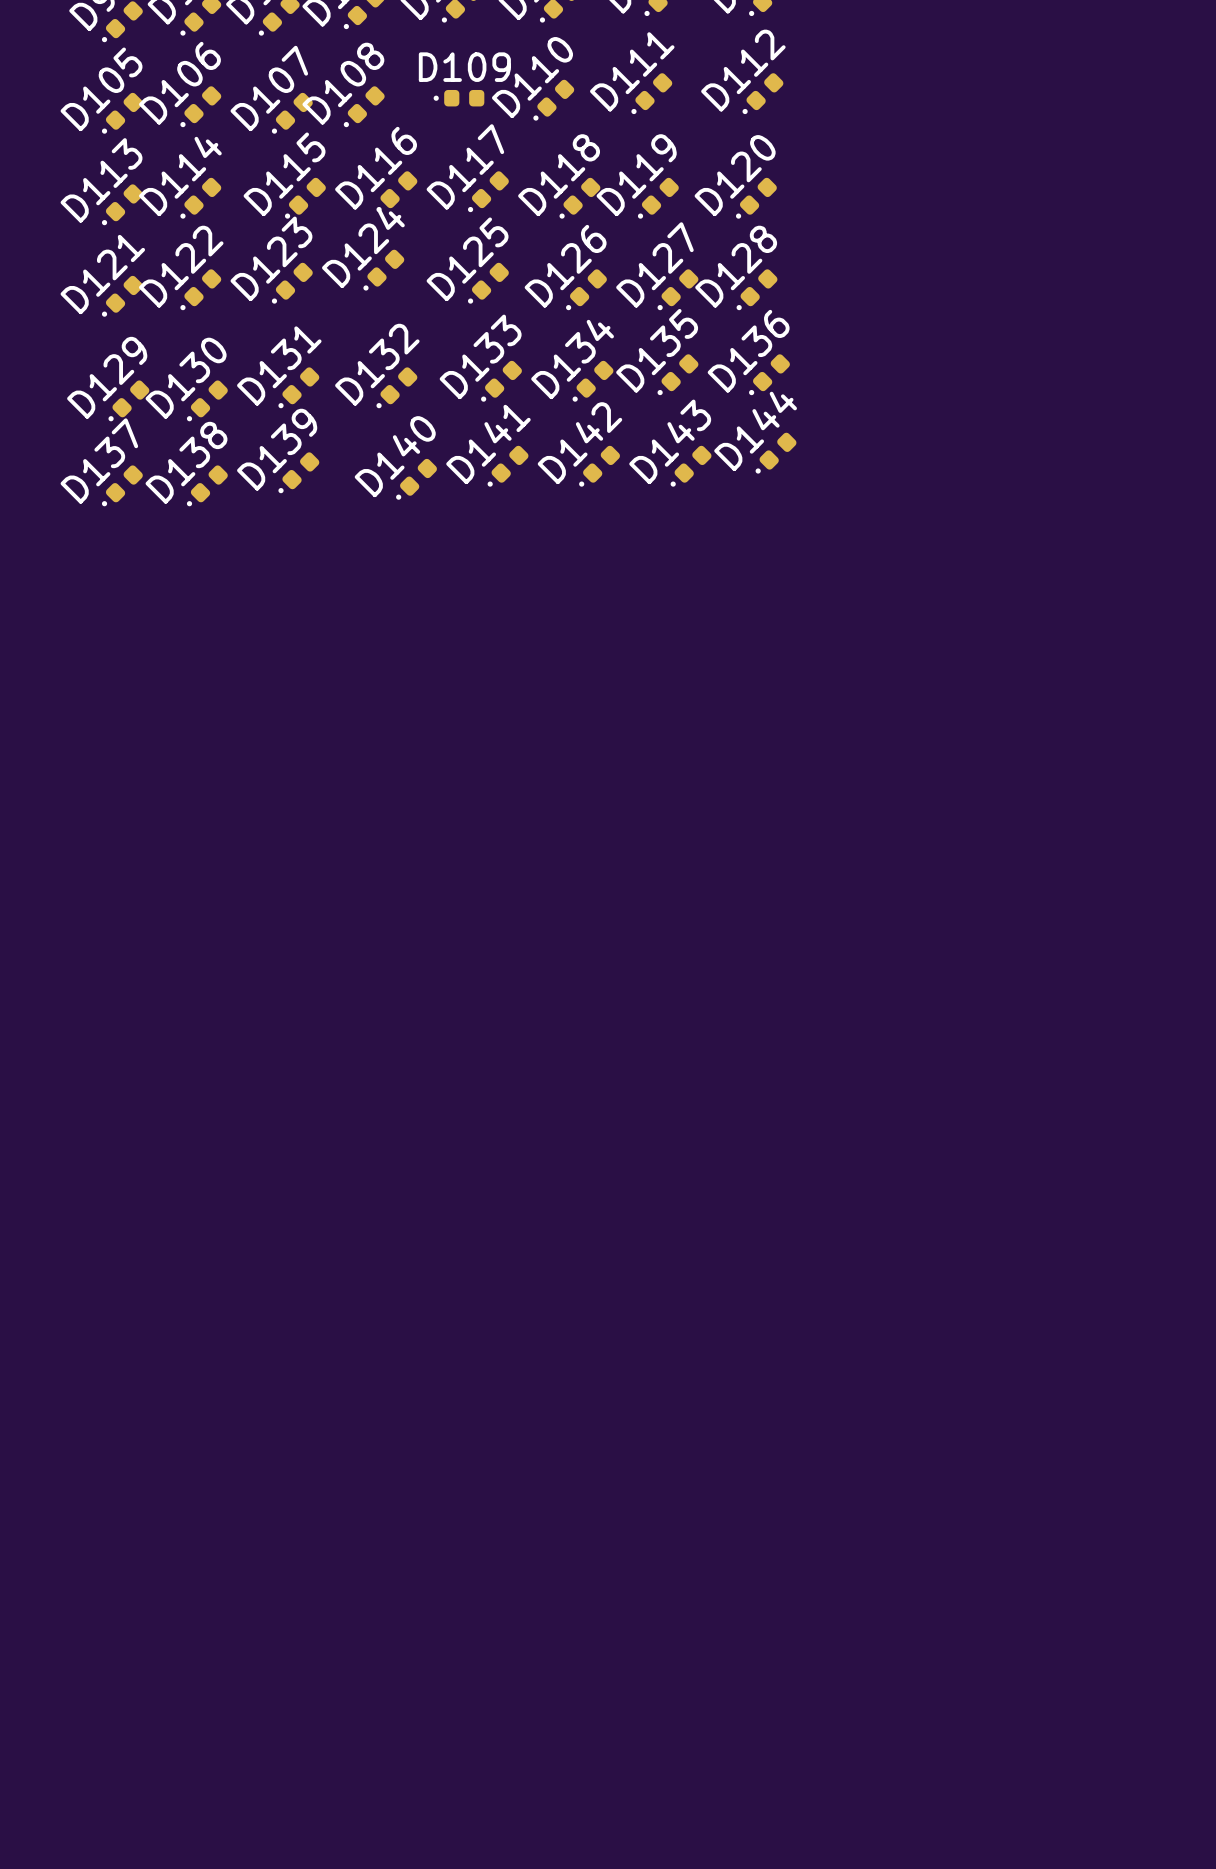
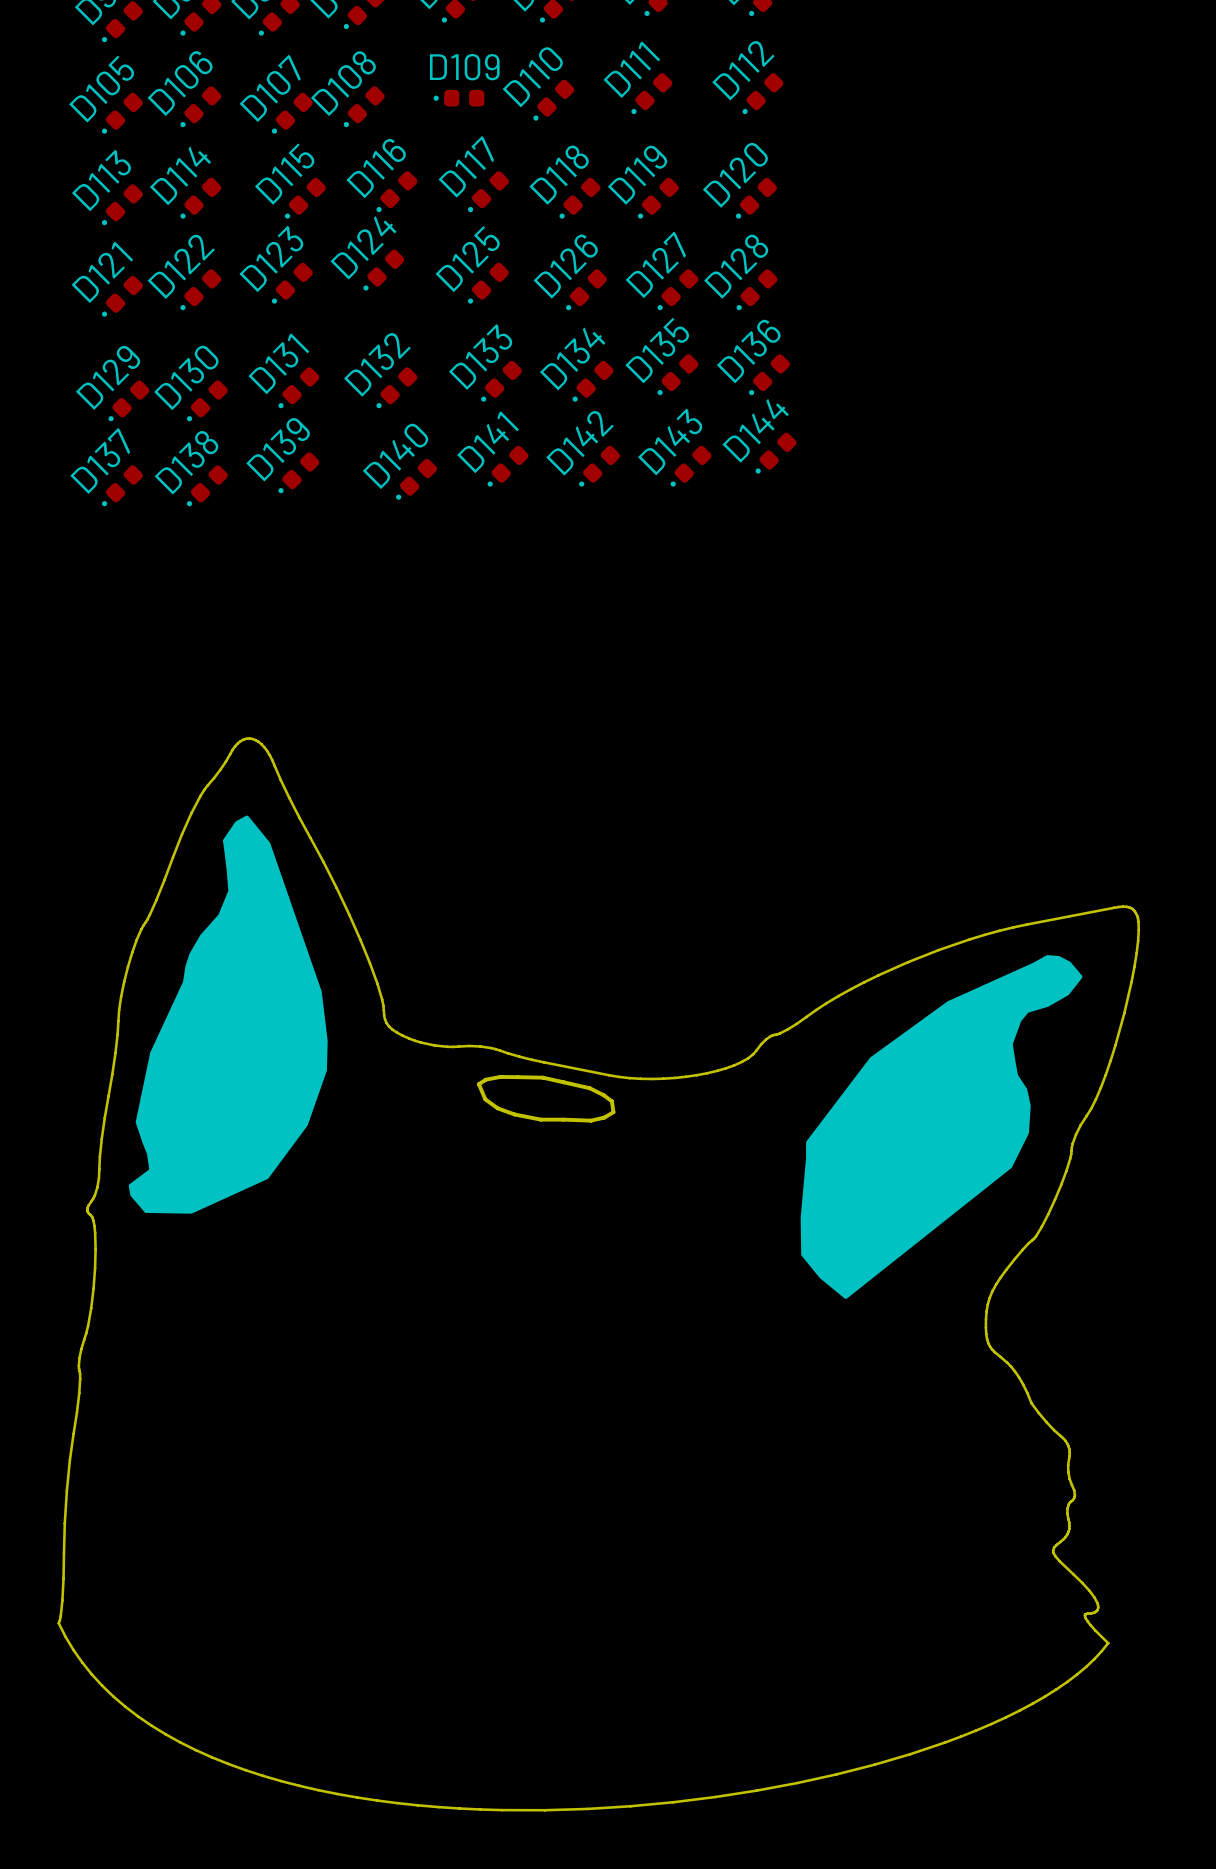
board edge: none -> (249, 738) (261, 744) (269, 755) (289, 798) (336, 888) (369, 963) (382, 999) (386, 1023) (402, 1035) (434, 1045) (491, 1048) (531, 1059) (629, 1078) (663, 1078) (707, 1073) (734, 1065) (748, 1058) (770, 1036) (787, 1029) (851, 989) (938, 950) (984, 934) (1027, 924) (1118, 906) (1129, 907) (1134, 910) (1138, 918) (1138, 930) (1134, 966) (1124, 1013) (1105, 1074) (1095, 1099) (1075, 1134) (1066, 1170) (1048, 1214) (1036, 1236) (1014, 1259) (996, 1284) (989, 1297) (986, 1319) (986, 1333) (990, 1346) (1014, 1371) (1031, 1403) (1046, 1422) (1065, 1440) (1069, 1449) (1068, 1472) (1074, 1497) (1067, 1508) (1068, 1531) (1053, 1550) (1055, 1556) (1089, 1590) (1097, 1603) (1096, 1610) (1084, 1615) (1090, 1625) (1108, 1643) (1086, 1666) (1056, 1689) (1005, 1717) (944, 1742) (874, 1764) (797, 1783) (715, 1797) (630, 1806) (544, 1810) (459, 1808) (397, 1803) (318, 1790) (262, 1775) (211, 1757) (165, 1734) (125, 1706) (91, 1674) (73, 1649) (58, 1623) (62, 1600) (66, 1491) (79, 1393) (79, 1358) (91, 1308) (95, 1268) (94, 1226) (92, 1217) (87, 1209) (94, 1195) (98, 1178) (101, 1138) (115, 1053) (121, 996) (136, 939) (156, 900) (191, 812) (204, 789) (220, 769) (235, 746) (240, 741) (249, 738)
drawing: none -> [128, 815, 328, 1214]
drawing: none -> [800, 955, 1083, 1299]
board edge: none -> (485, 1079) (500, 1076) (542, 1077) (589, 1088) (611, 1101) (613, 1112) (604, 1117) (591, 1120) (540, 1119) (514, 1114) (497, 1108) (485, 1099) (478, 1084) (485, 1080)

